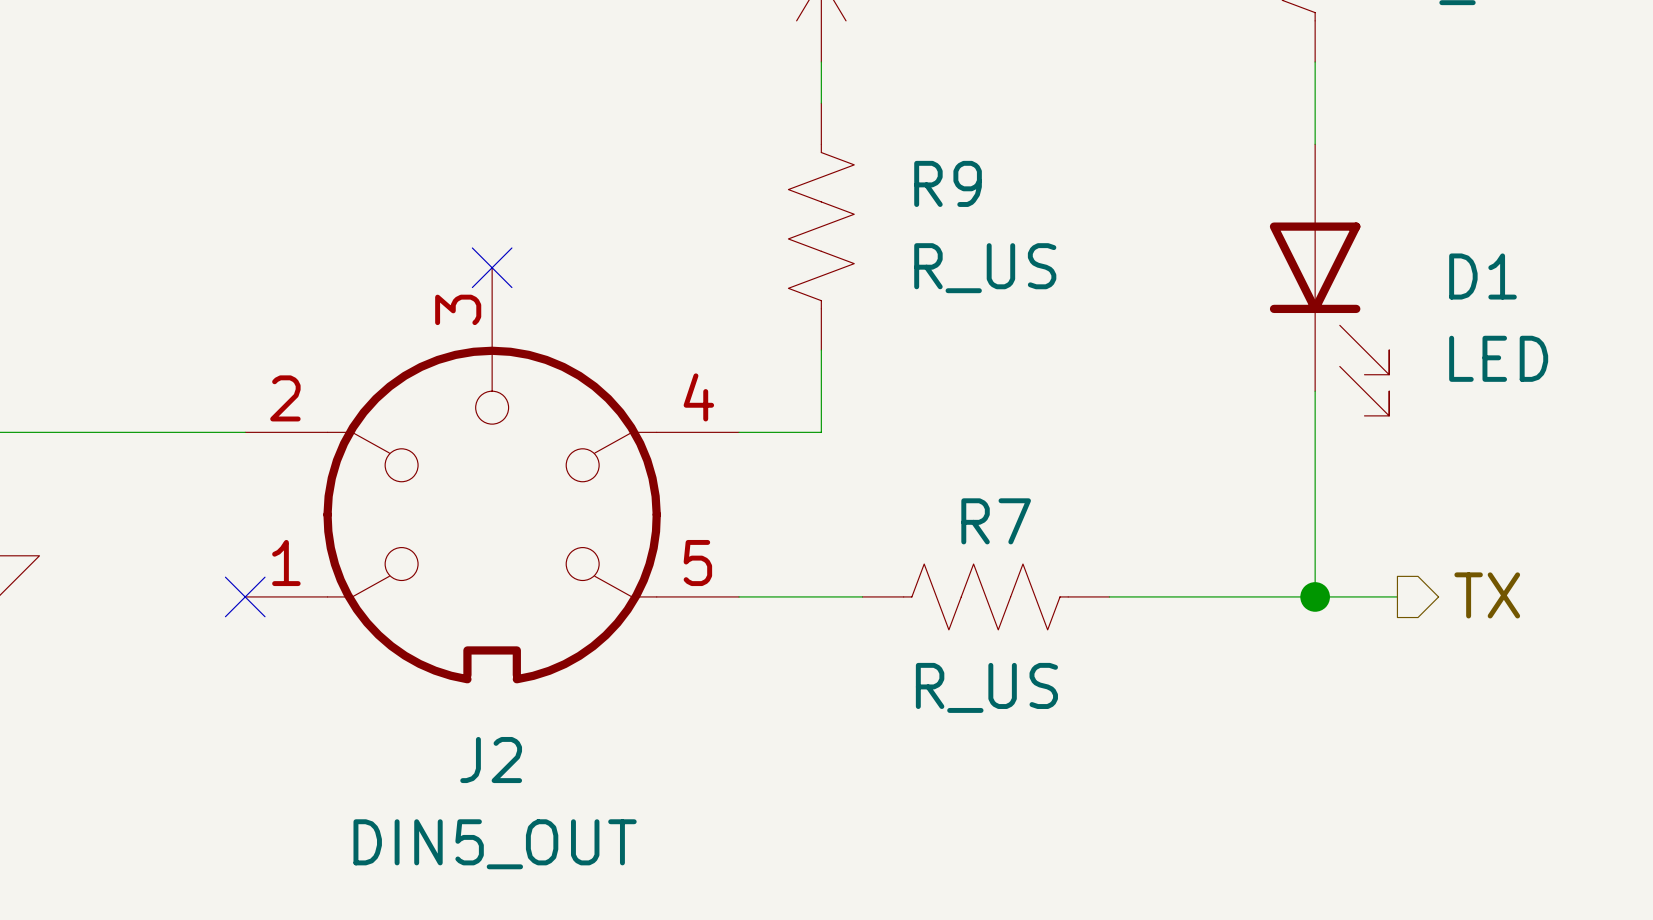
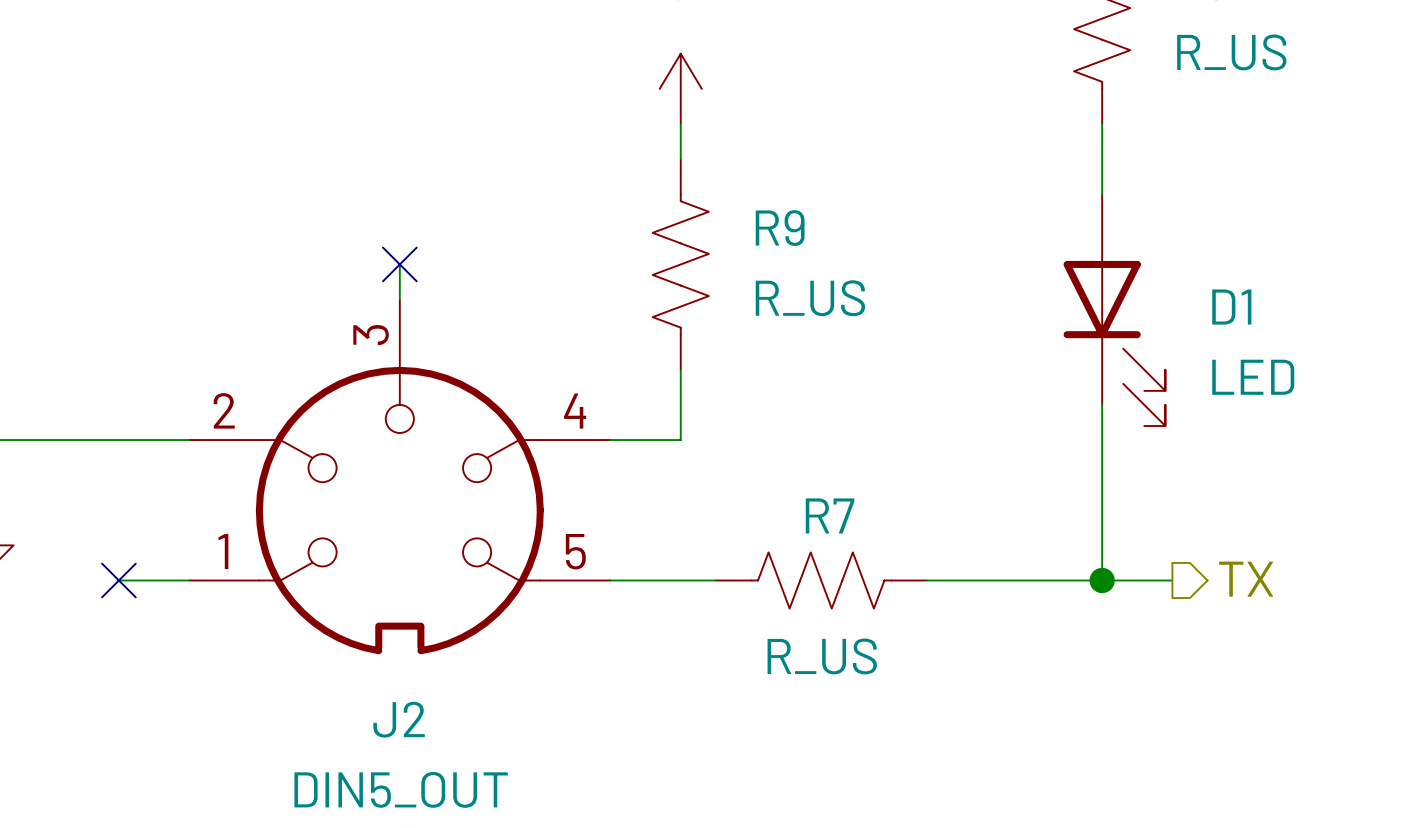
wire: none -> (399, 264) (399, 299)
no-connect mark position: (492, 267) -> (399, 264)
wire: none -> (118, 580) (189, 580)
no-connect mark position: (245, 596) -> (118, 580)

